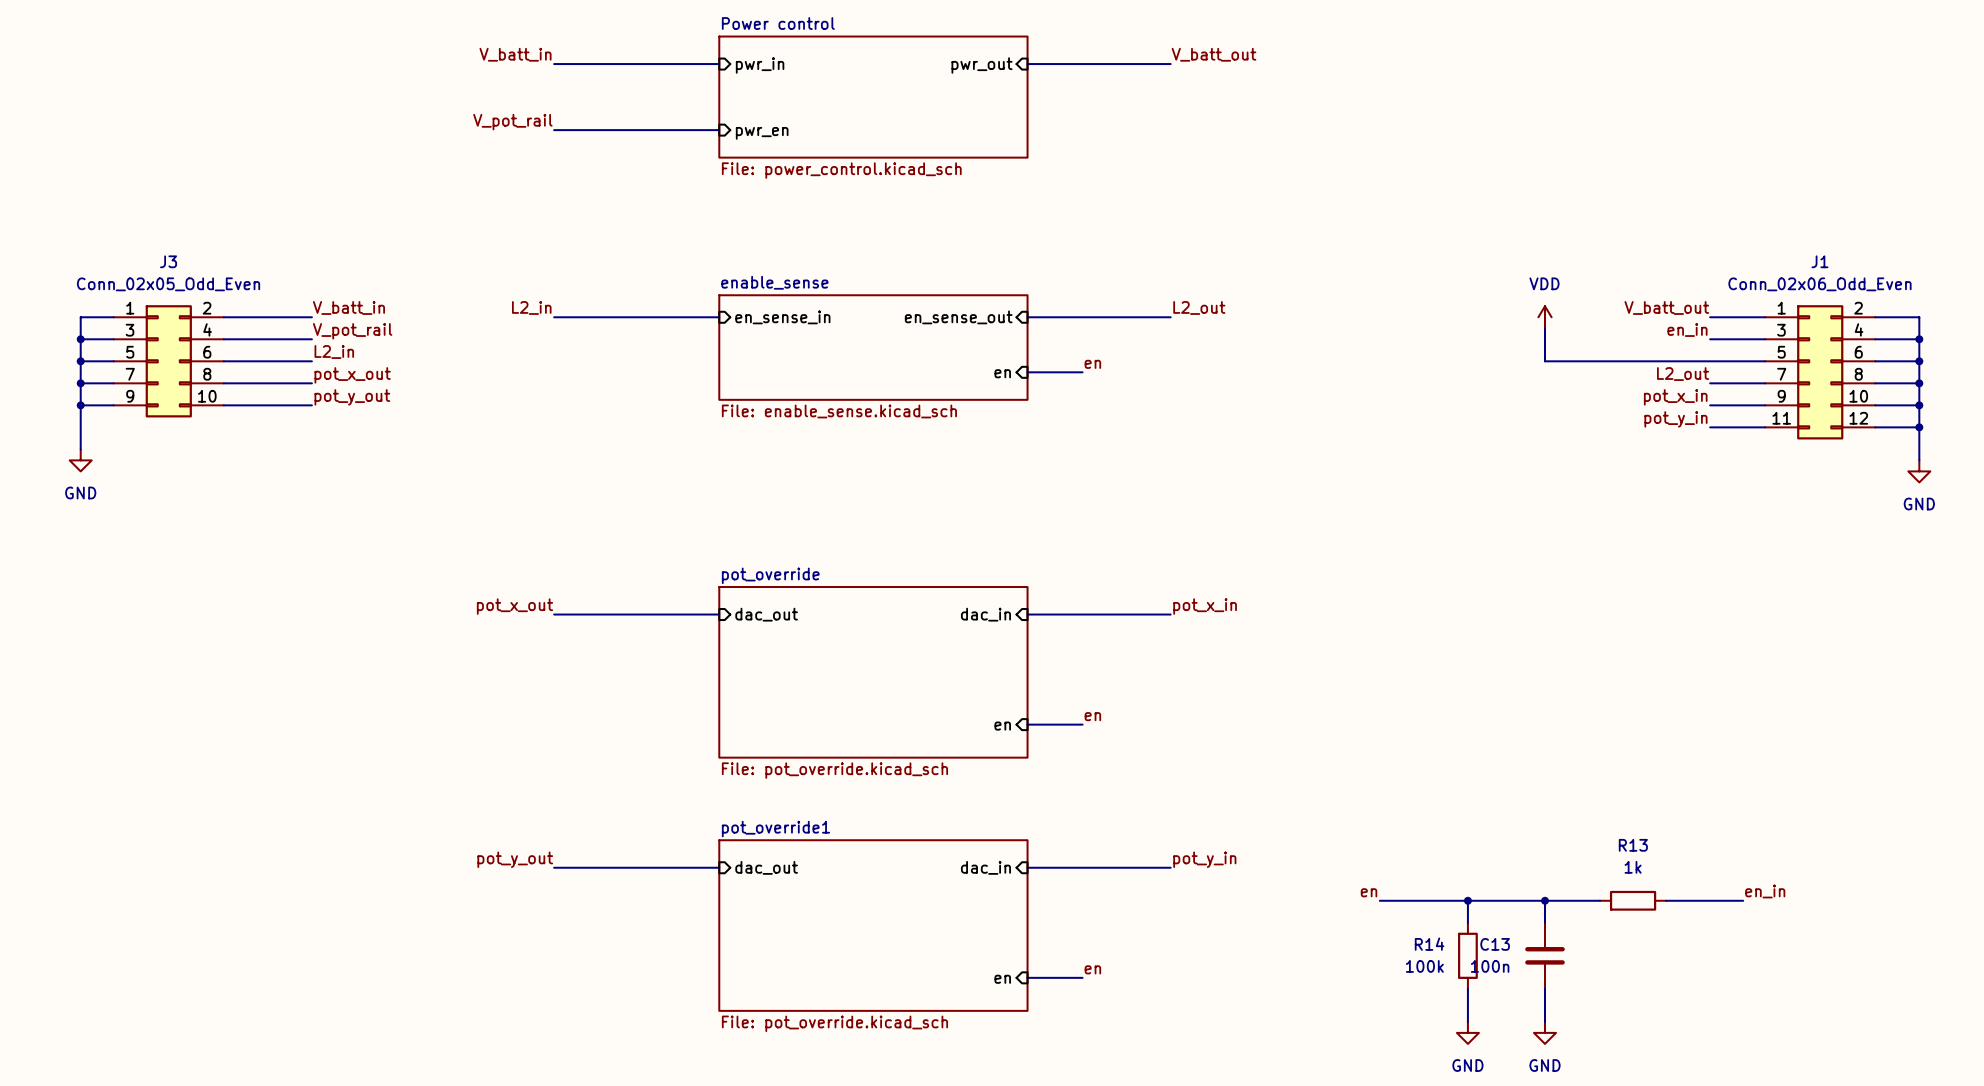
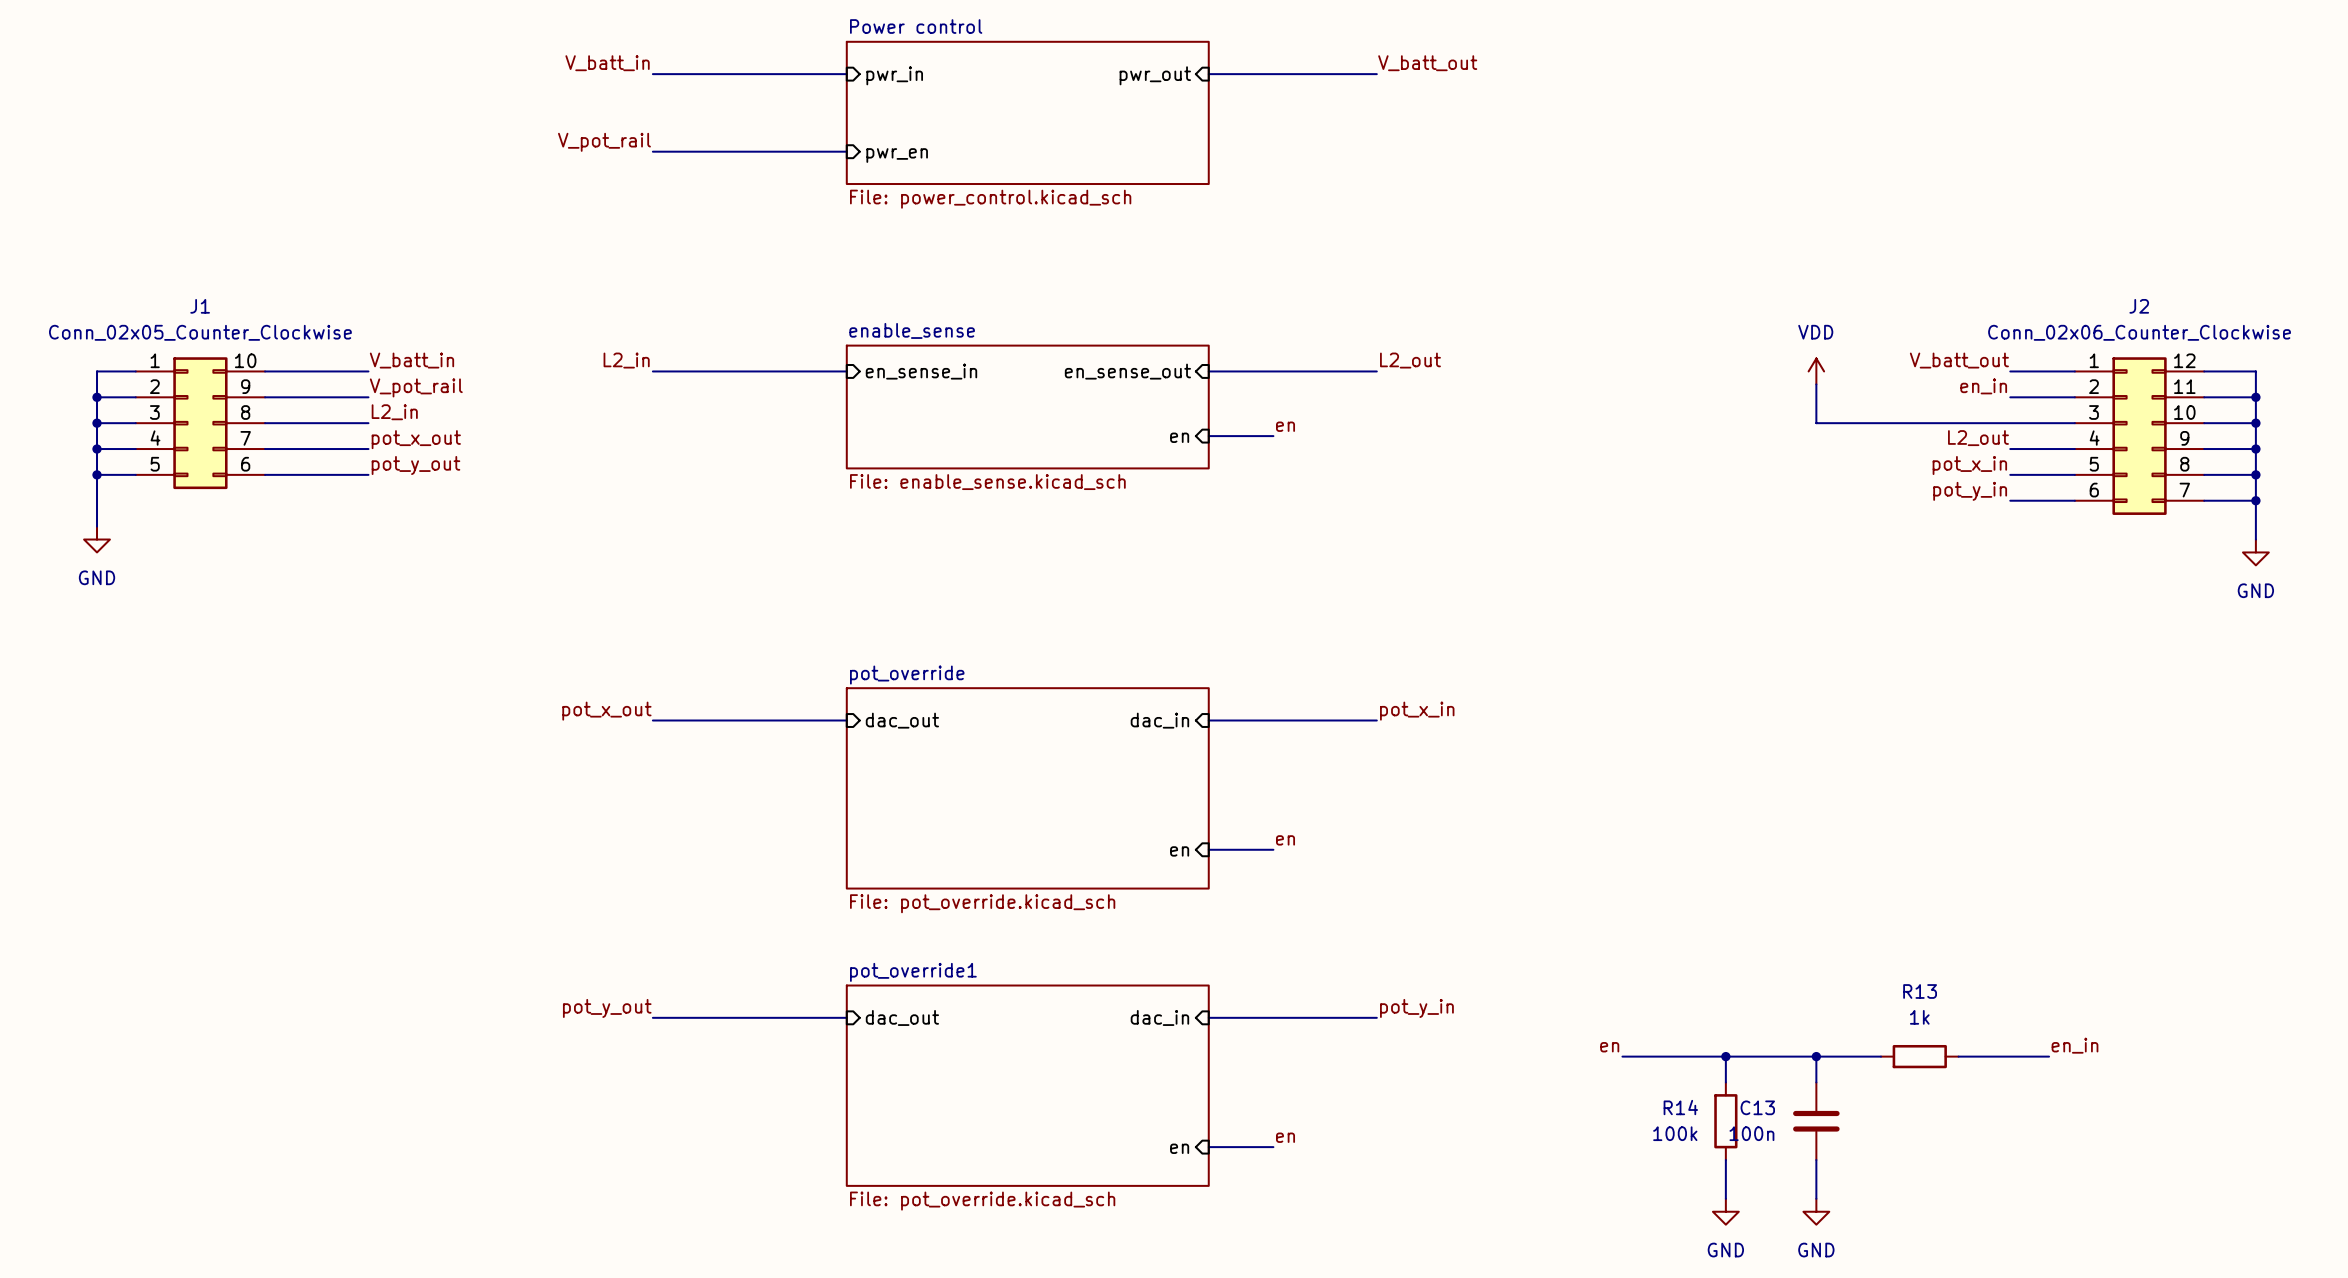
J1 value: Conn_02x06_Odd_Even (1819, 284) -> Conn_02x05_Counter_Clockwise (200, 332)
J1 symbol: [1765, 305, 1876, 440] -> [135, 357, 266, 490]
J3: Conn_02x05_Odd_Even (168, 361) -> none
J2: none -> Conn_02x06_Counter_Clockwise (2139, 436)

